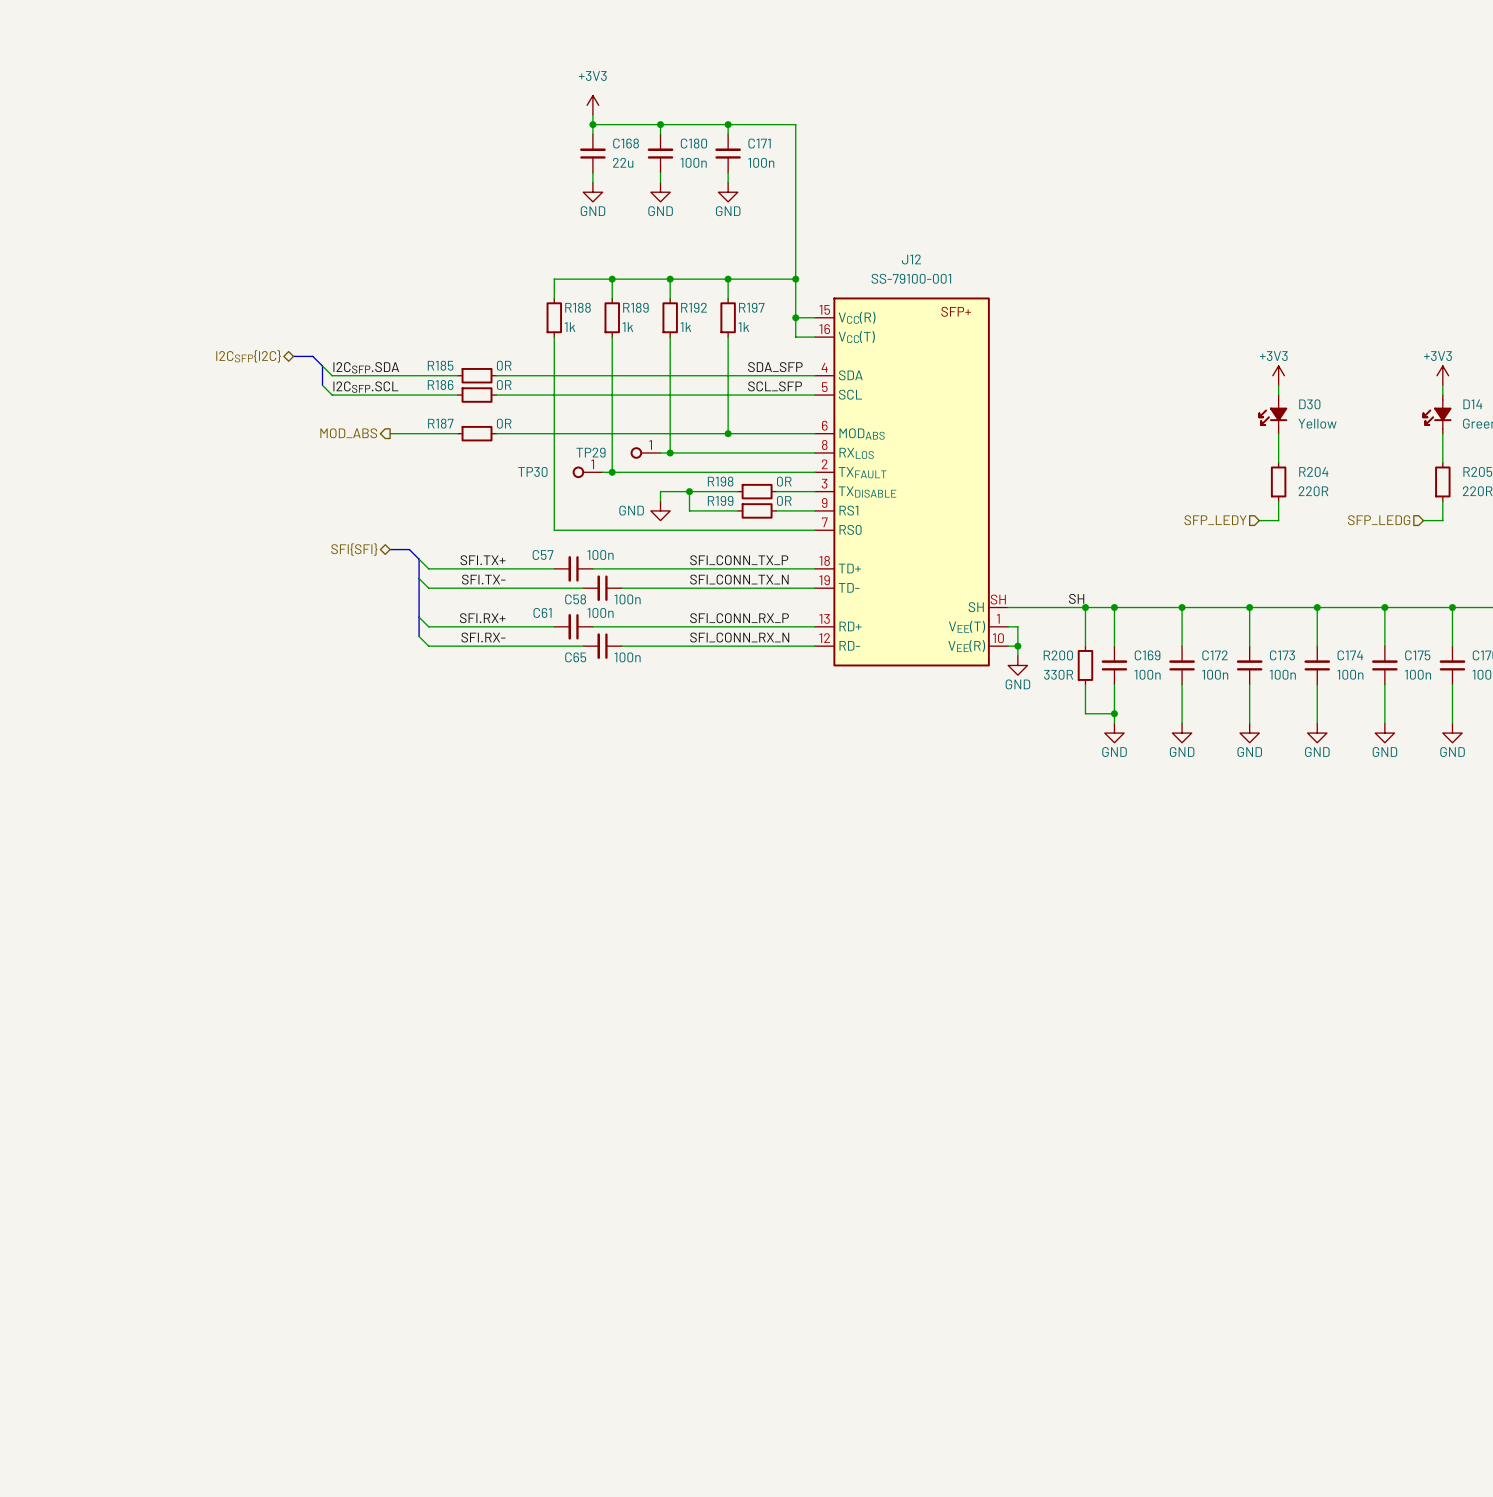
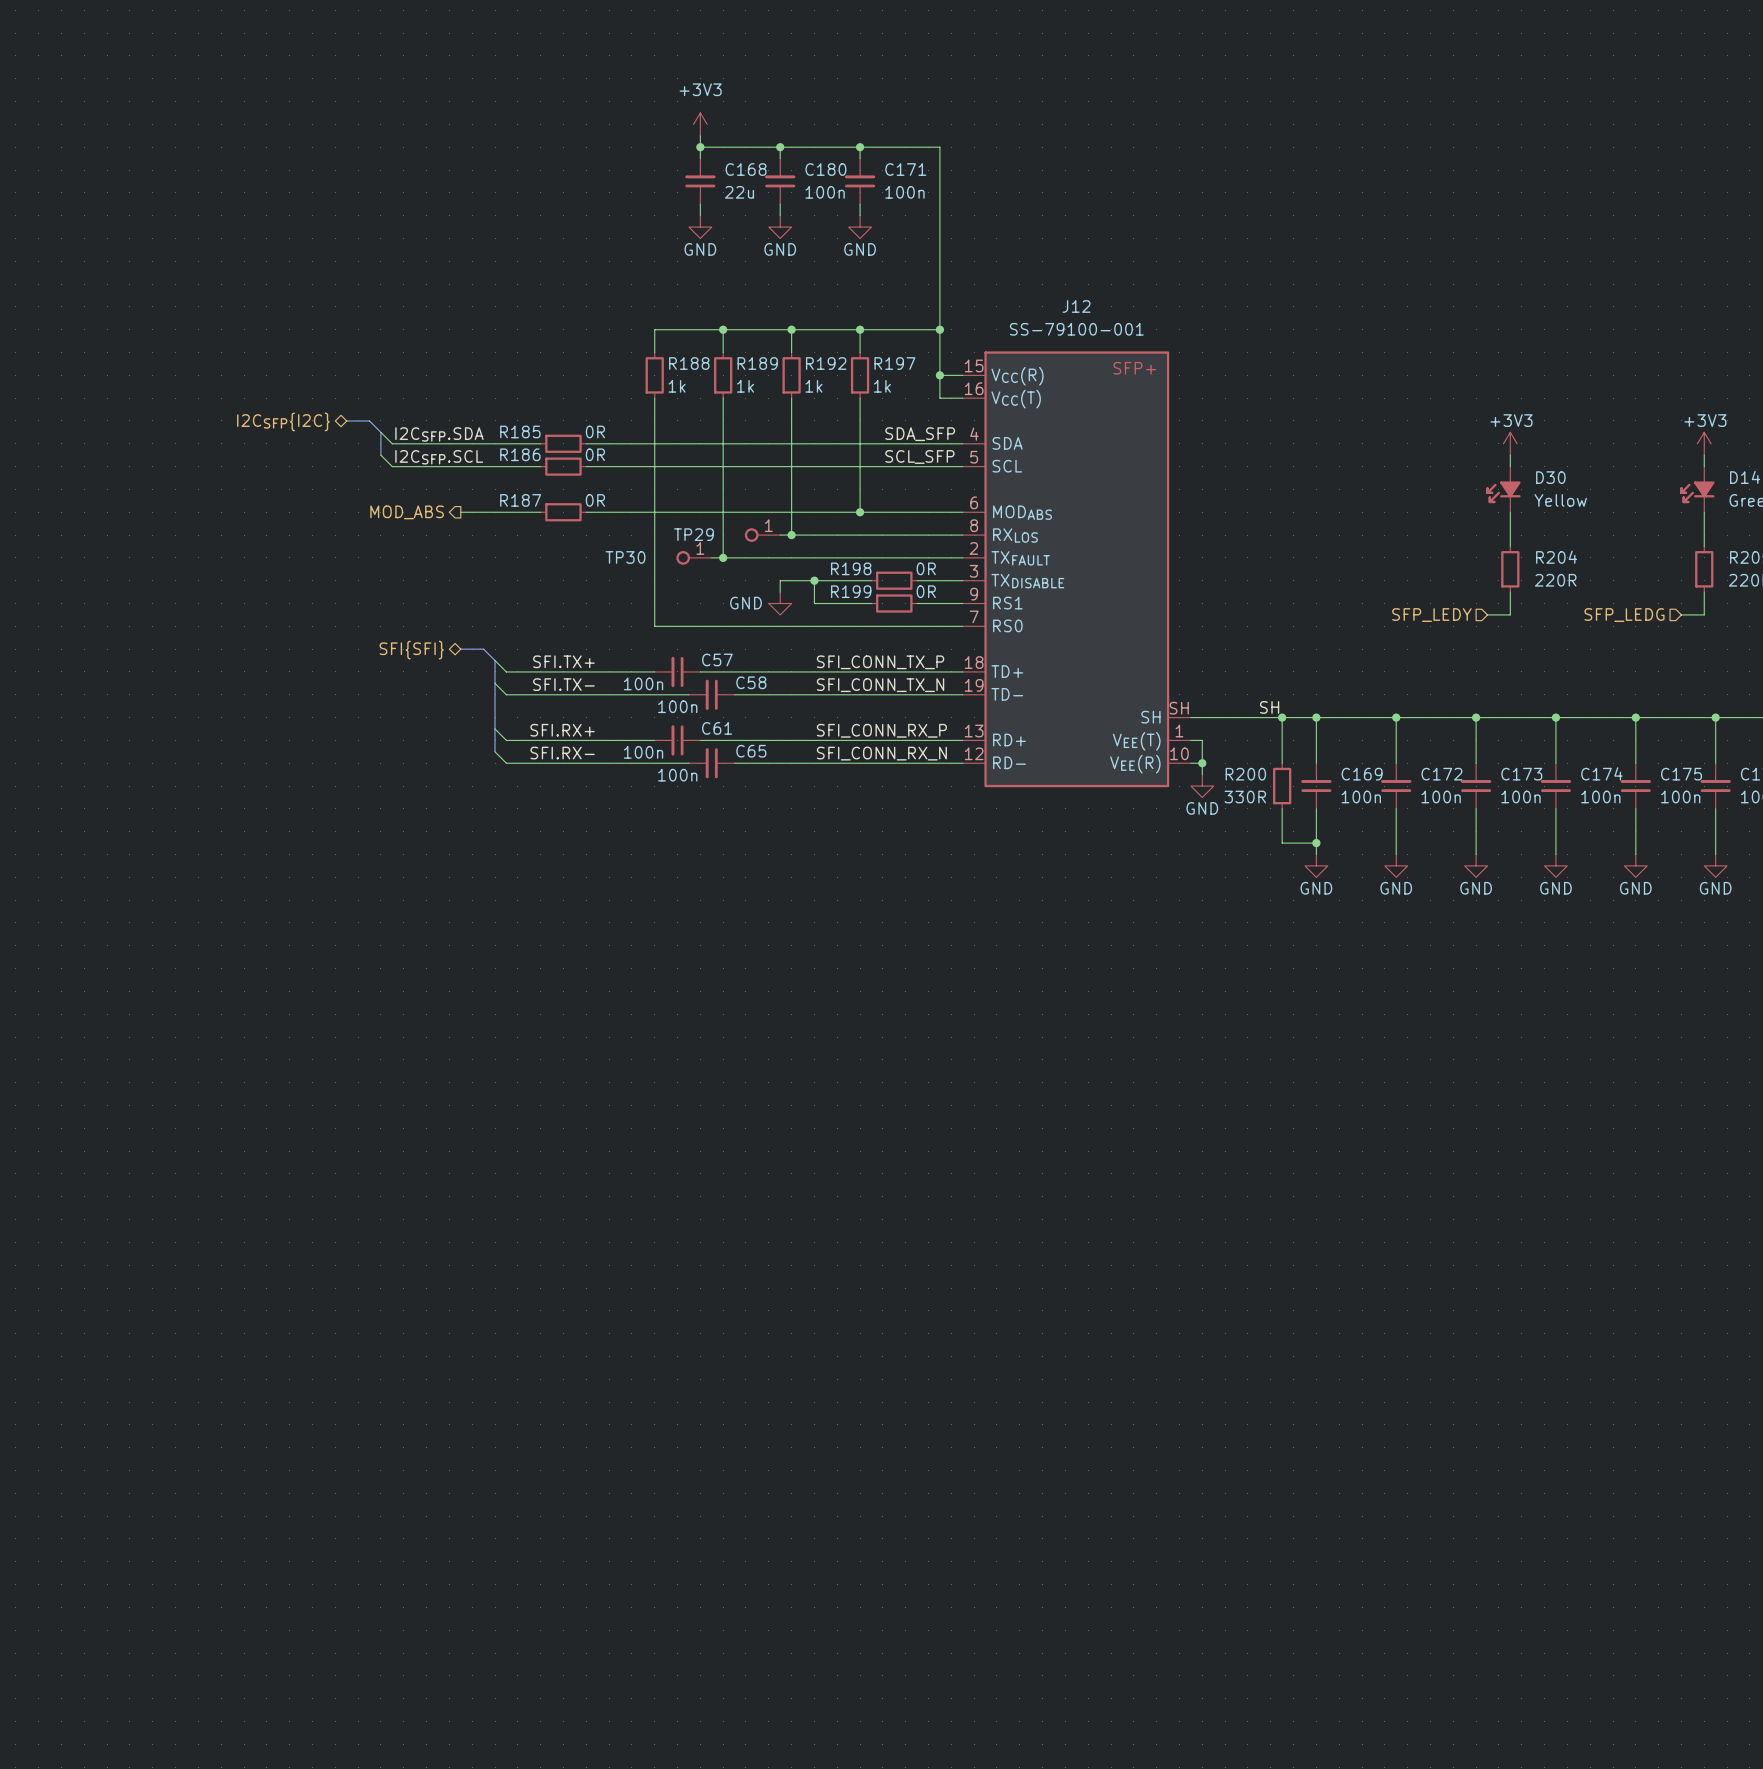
C57 name position: C57 (543, 555) -> C57 (717, 659)
C57 text position: 100n (600, 555) -> 100n (643, 683)
C58 name position: C58 (575, 599) -> C58 (751, 682)
C58 text position: 100n (627, 599) -> 100n (677, 706)
C61 name position: C61 (542, 612) -> C61 (717, 728)
C61 text position: 100n (600, 612) -> 100n (643, 752)
C65 name position: C65 (575, 657) -> C65 (751, 751)
C65 text position: 100n (627, 657) -> 100n (677, 775)

